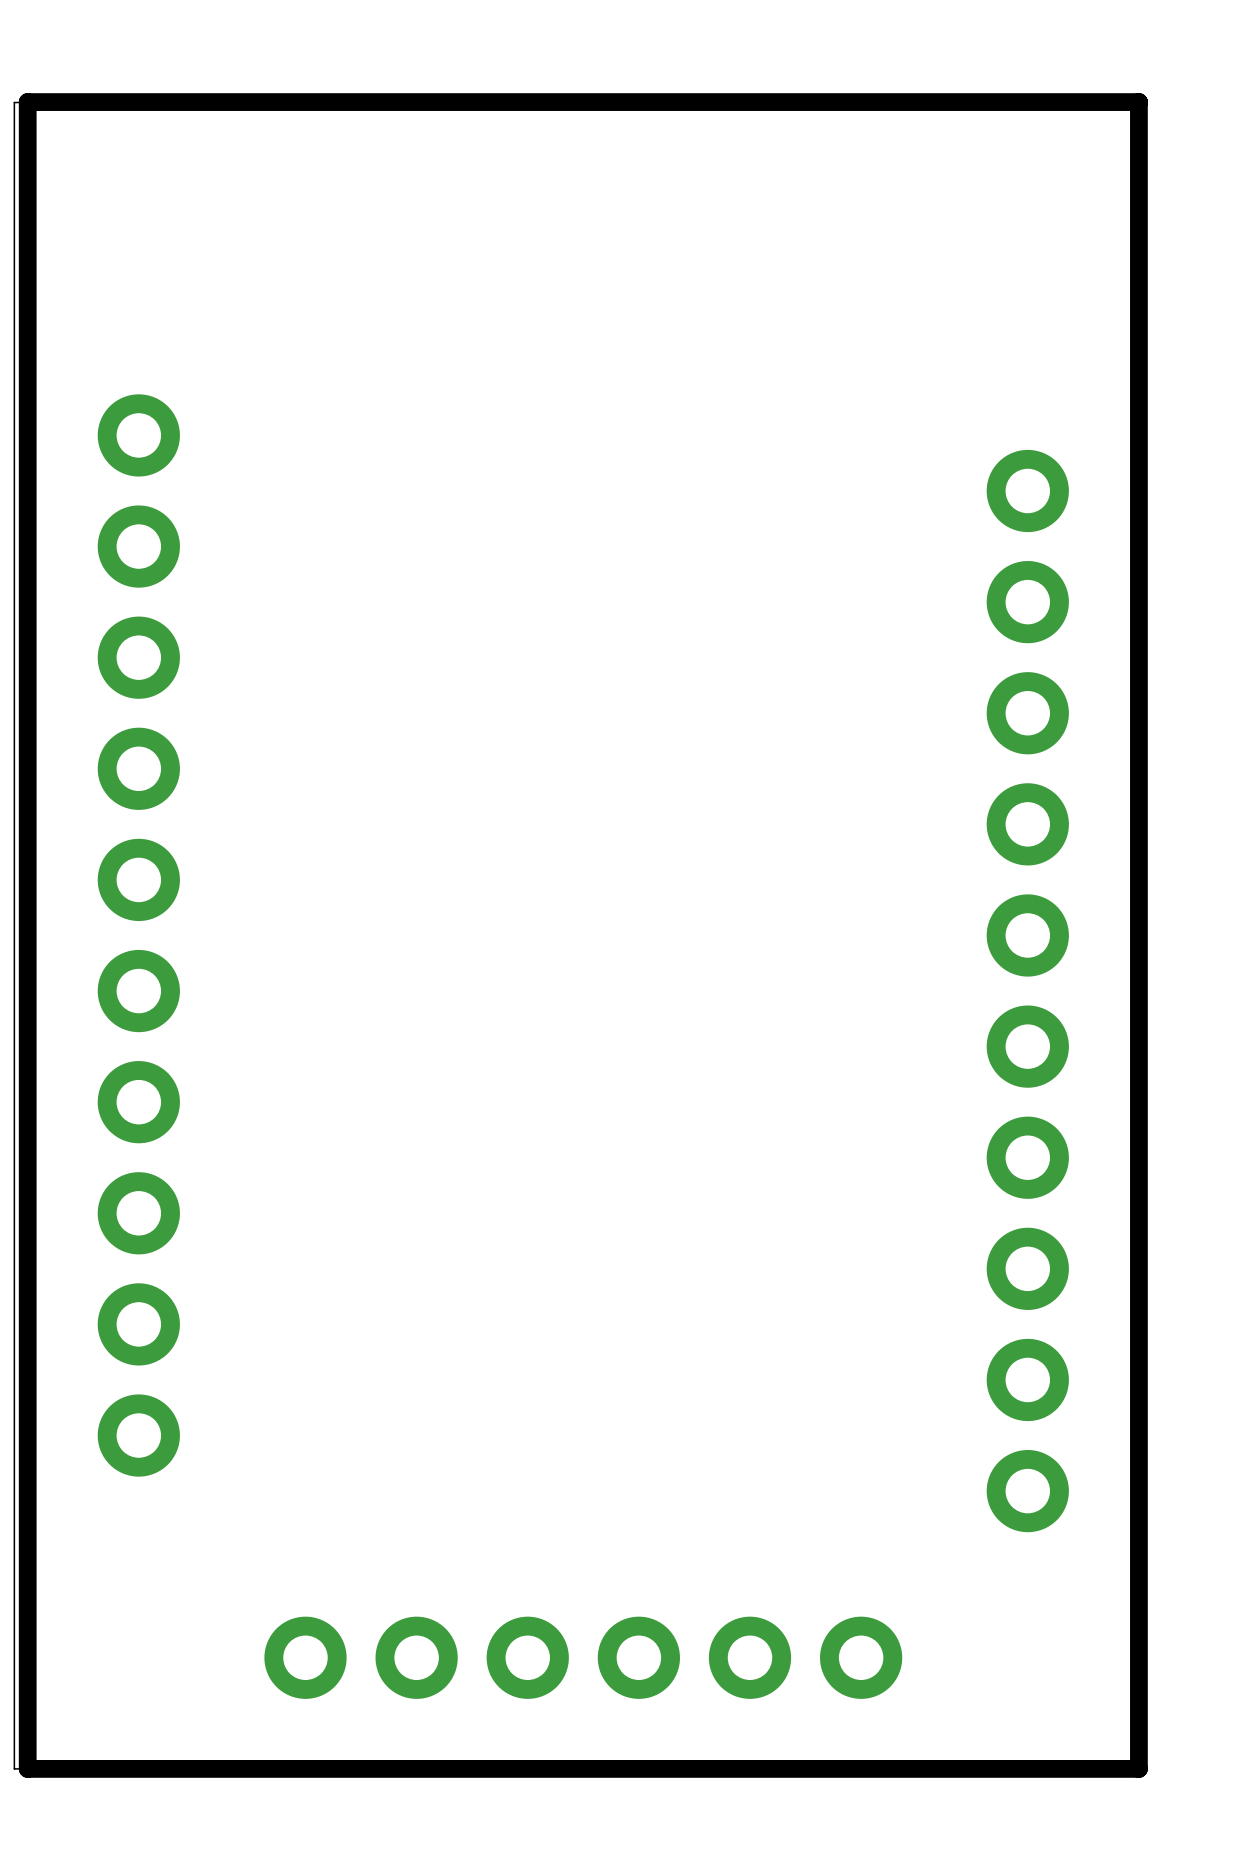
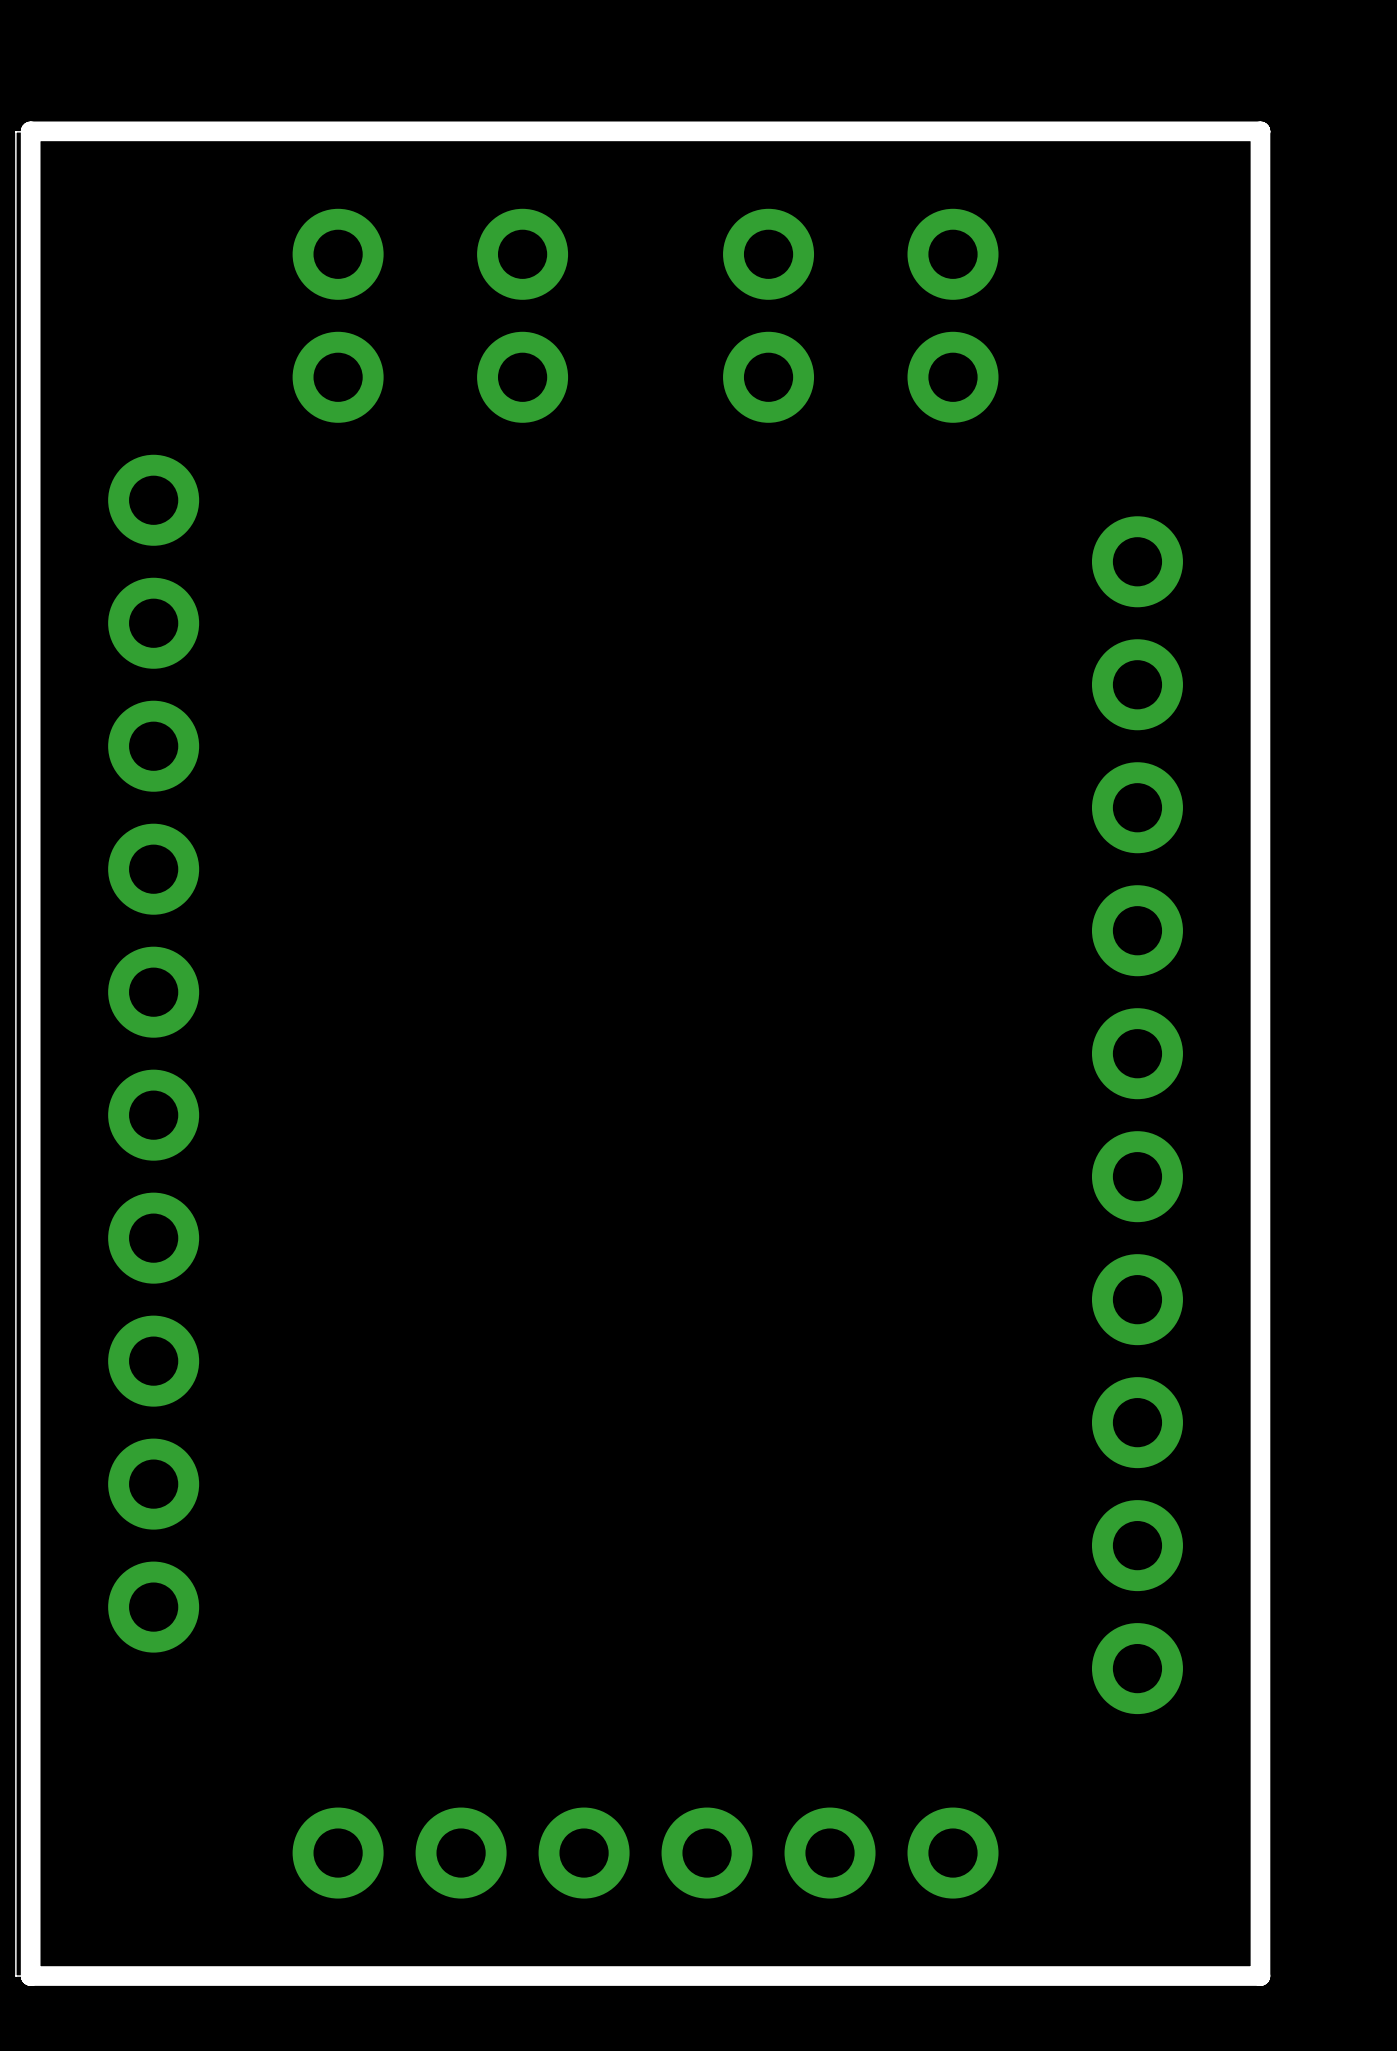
part: none -> (338, 315)
part: none -> (522, 315)
part: none -> (768, 315)
part: none -> (953, 315)

